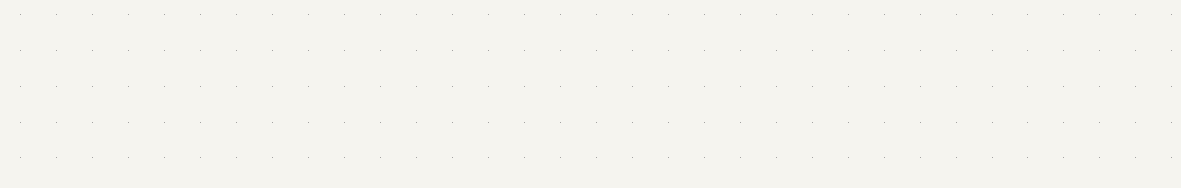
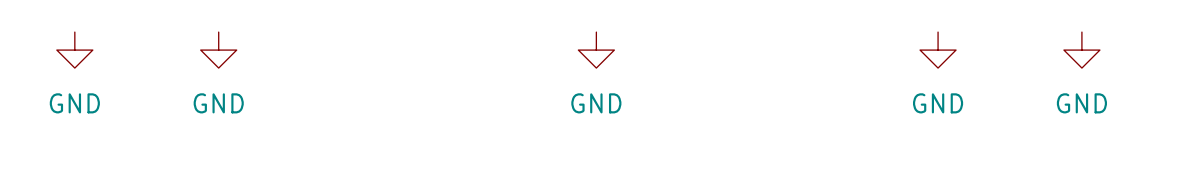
power symbol: none -> GND (74, 50)
power symbol: none -> GND (218, 50)
power symbol: none -> GND (596, 50)
power symbol: none -> GND (938, 50)
power symbol: none -> GND (1081, 50)

